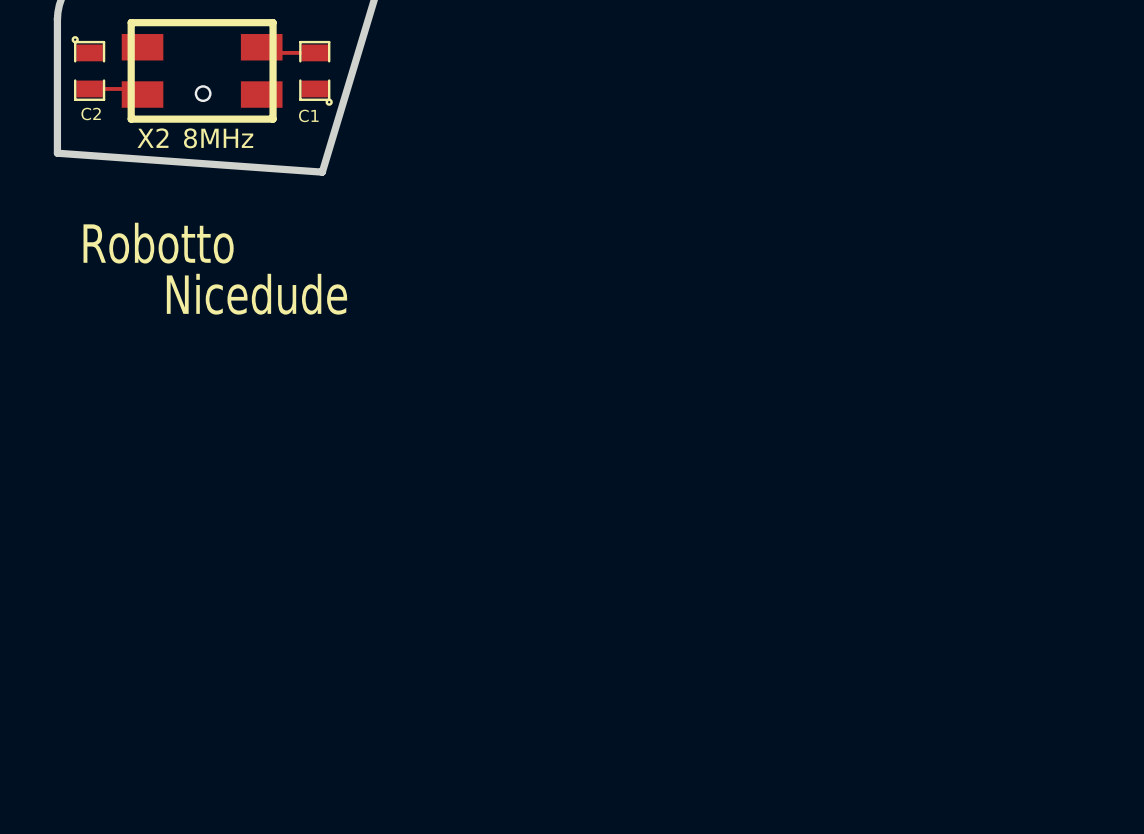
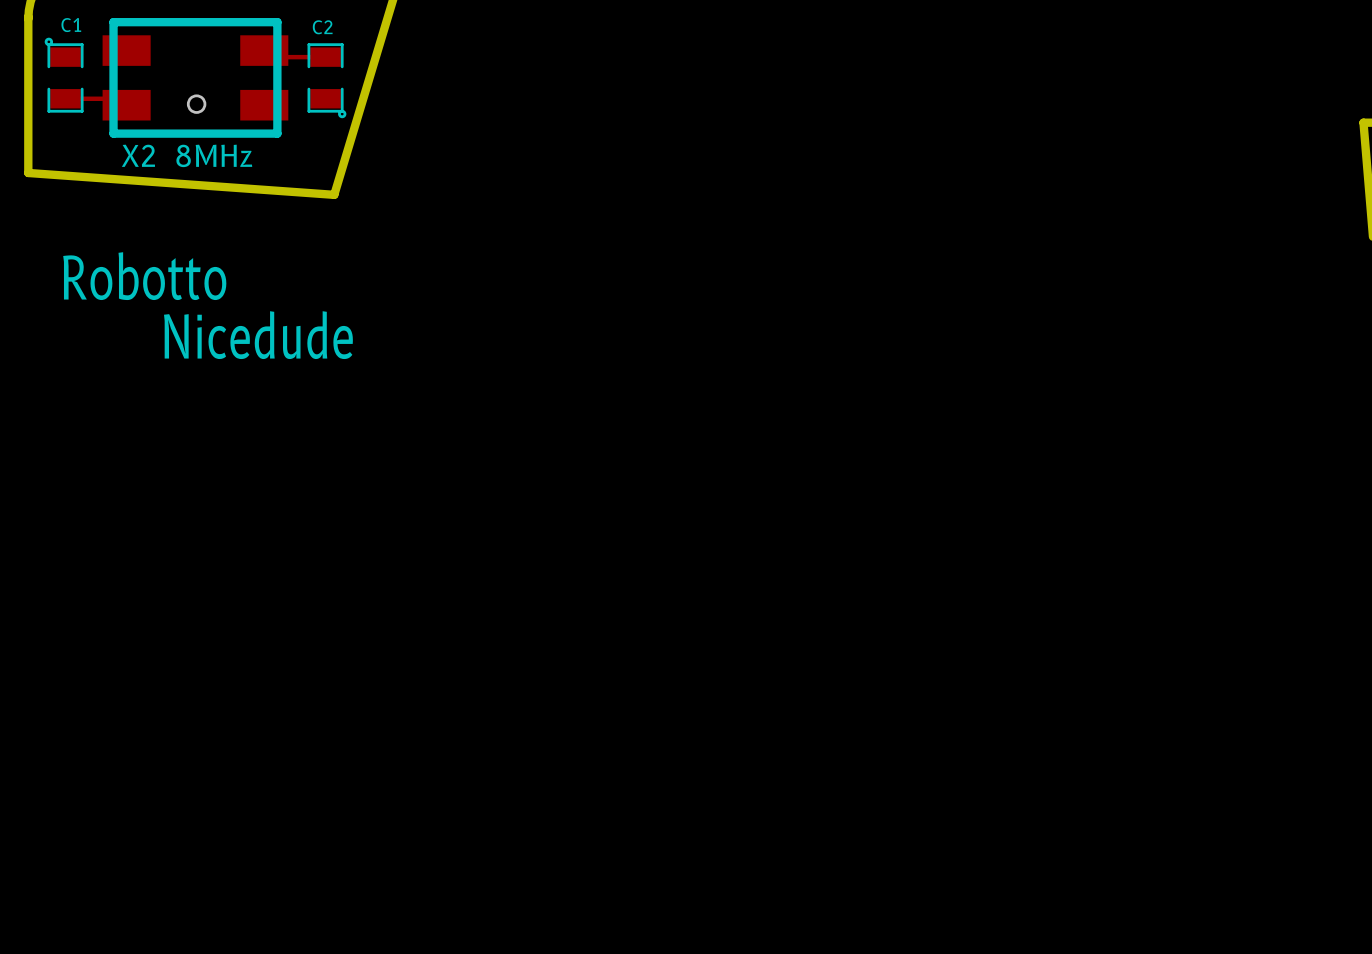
C2 name: C2 (91, 113) -> C1 (71, 25)
C1 name: C1 (308, 115) -> C2 (322, 27)

